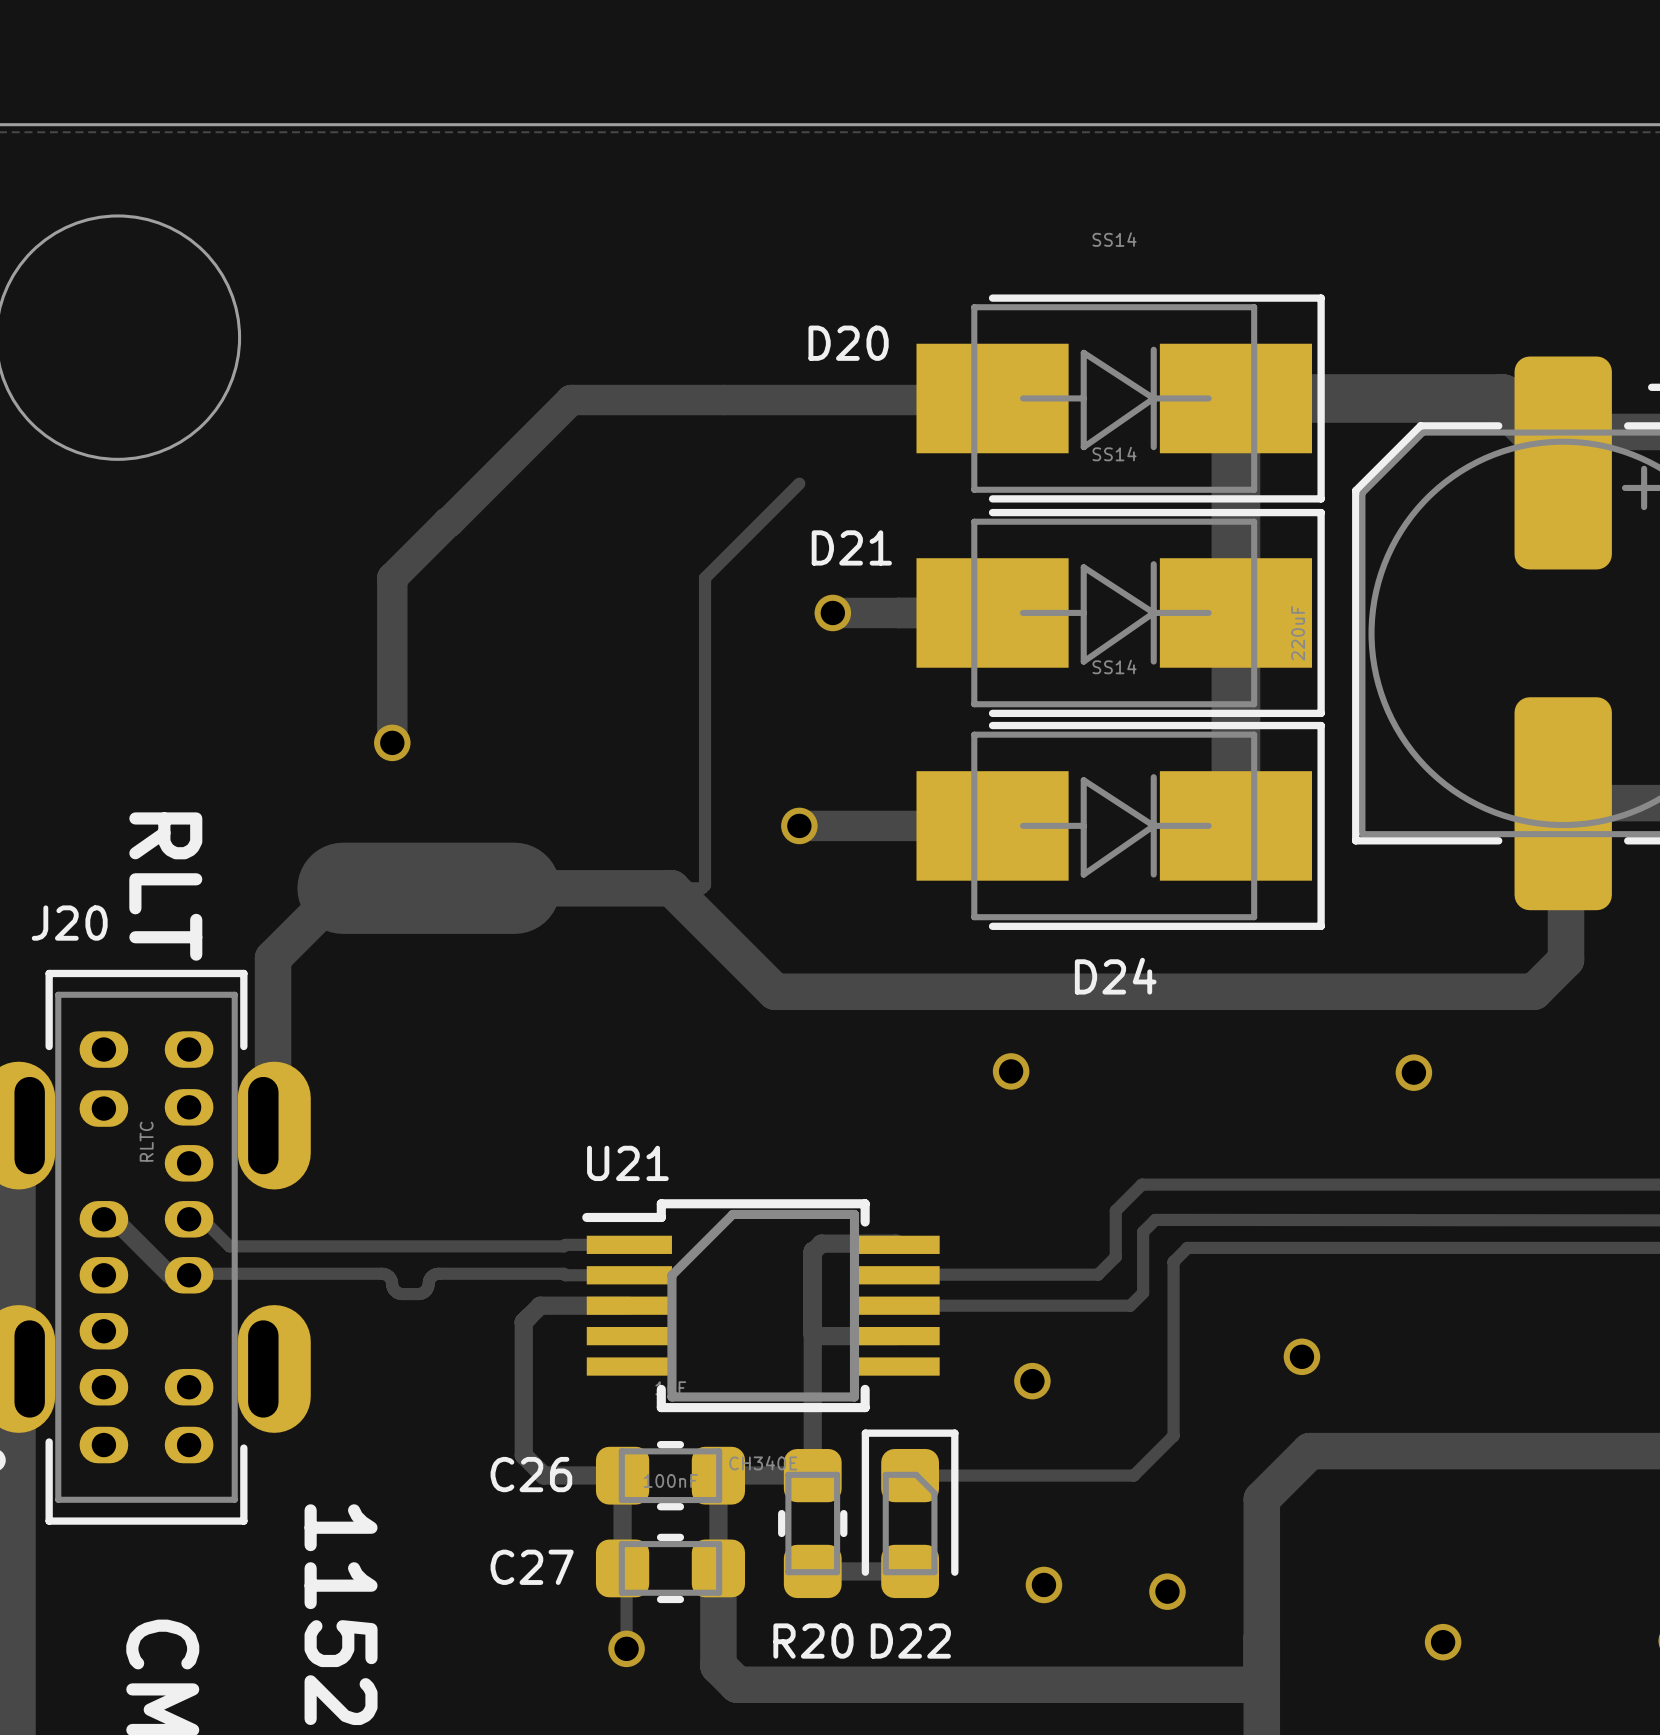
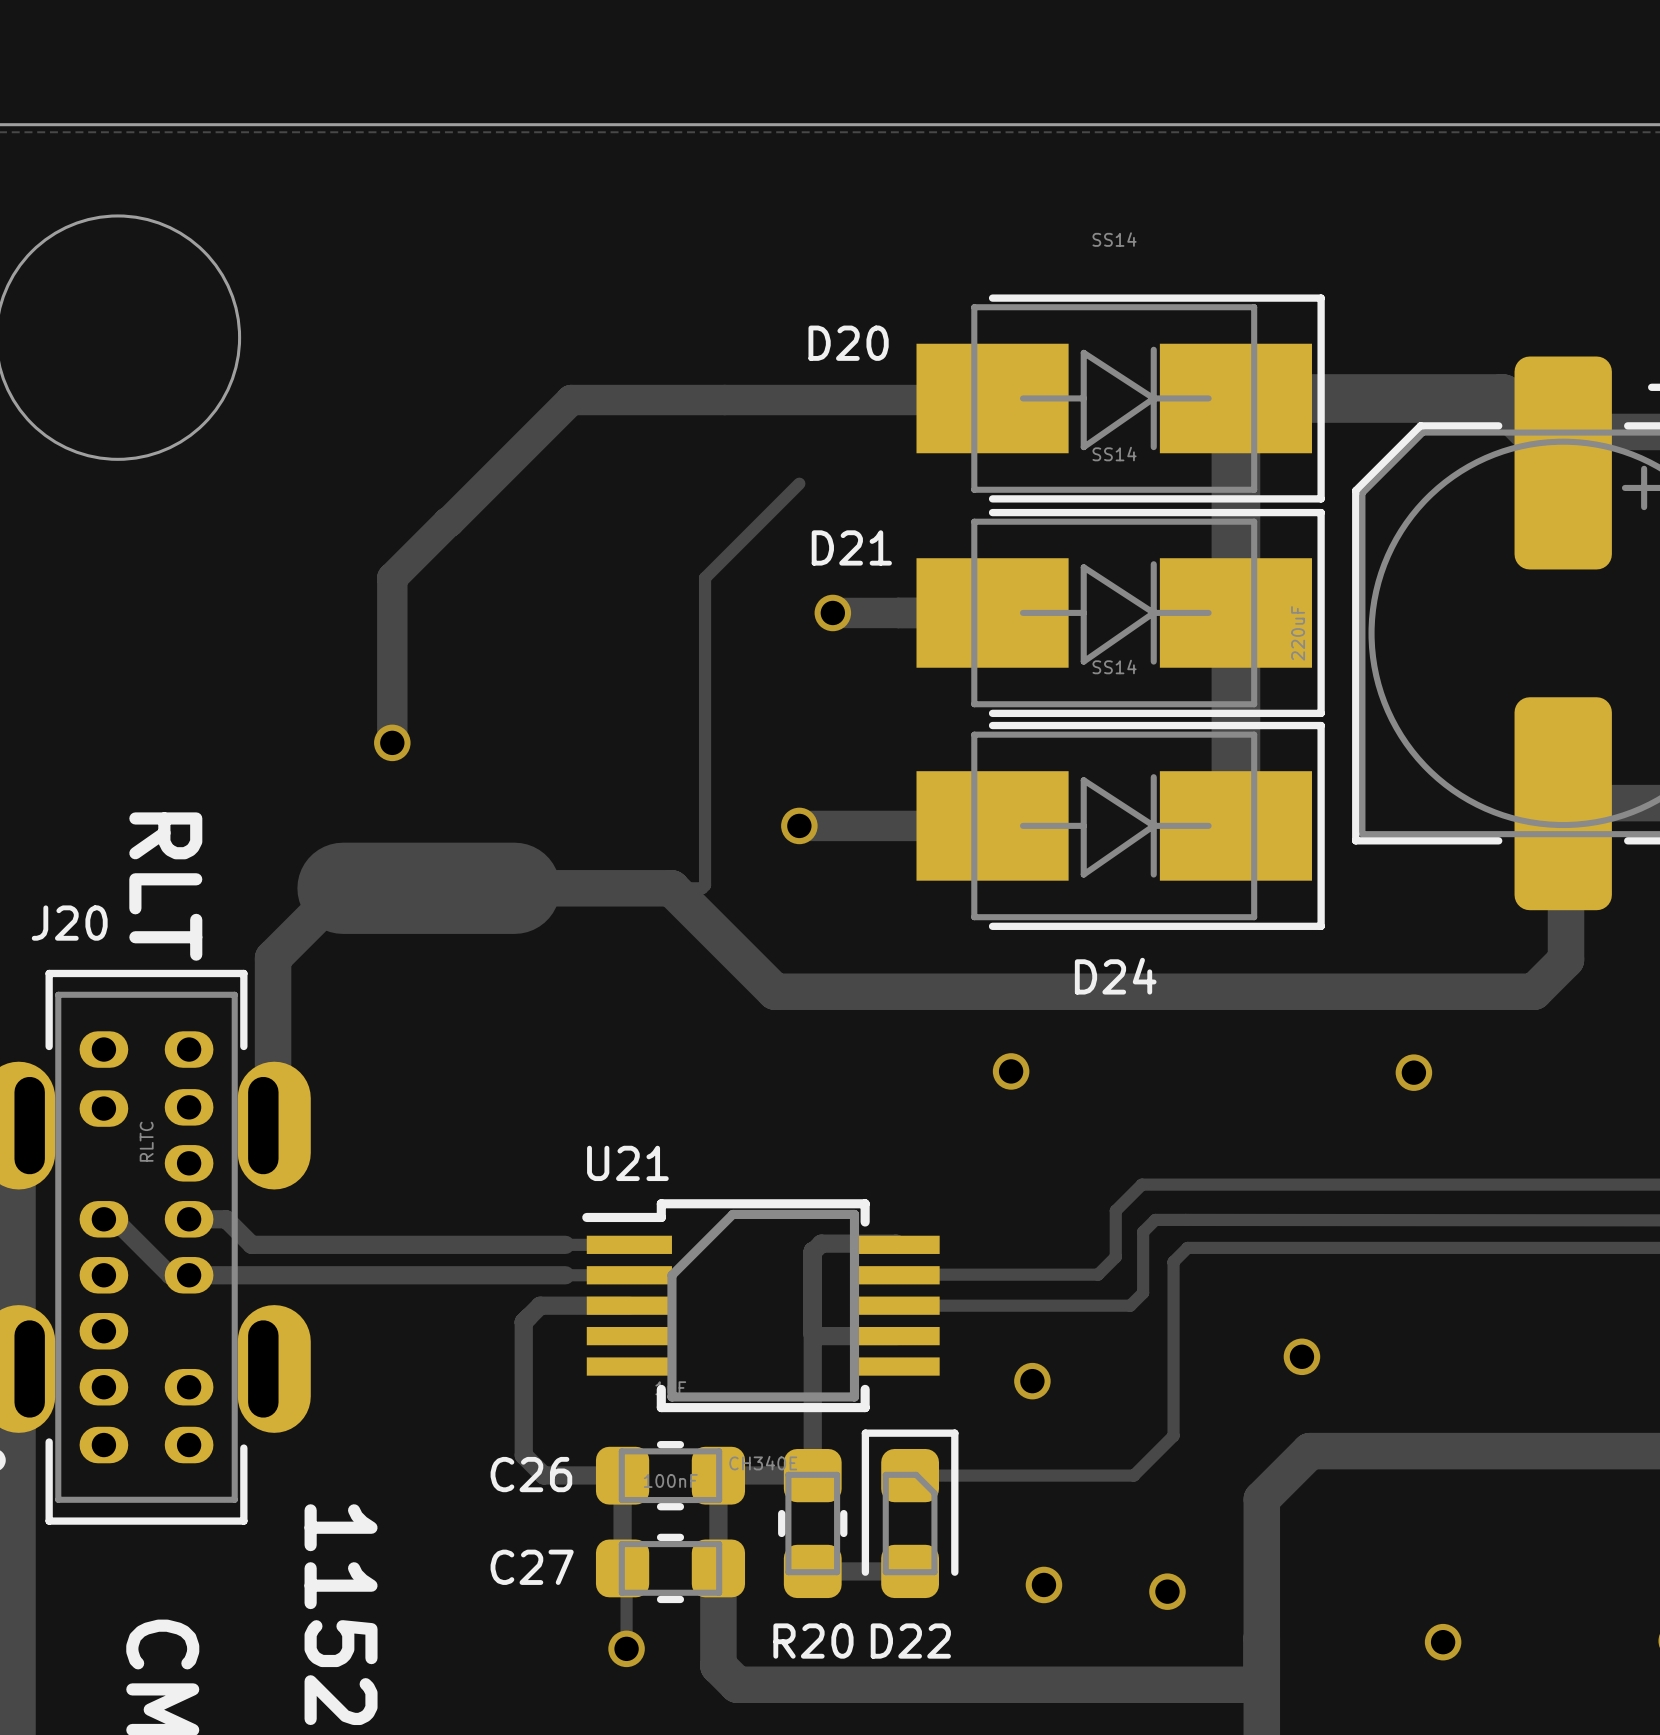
track: (190, 1219) (203, 1219) (229, 1246) (563, 1246) (565, 1244) -> (188, 1219) (226, 1219) (251, 1244) (565, 1244)
track: (189, 1274) (381, 1273) (389, 1277) (394, 1290) (402, 1294) (422, 1293) (427, 1288) (430, 1277) (436, 1274) (563, 1273) (565, 1275) -> (170, 1275) (565, 1275)

